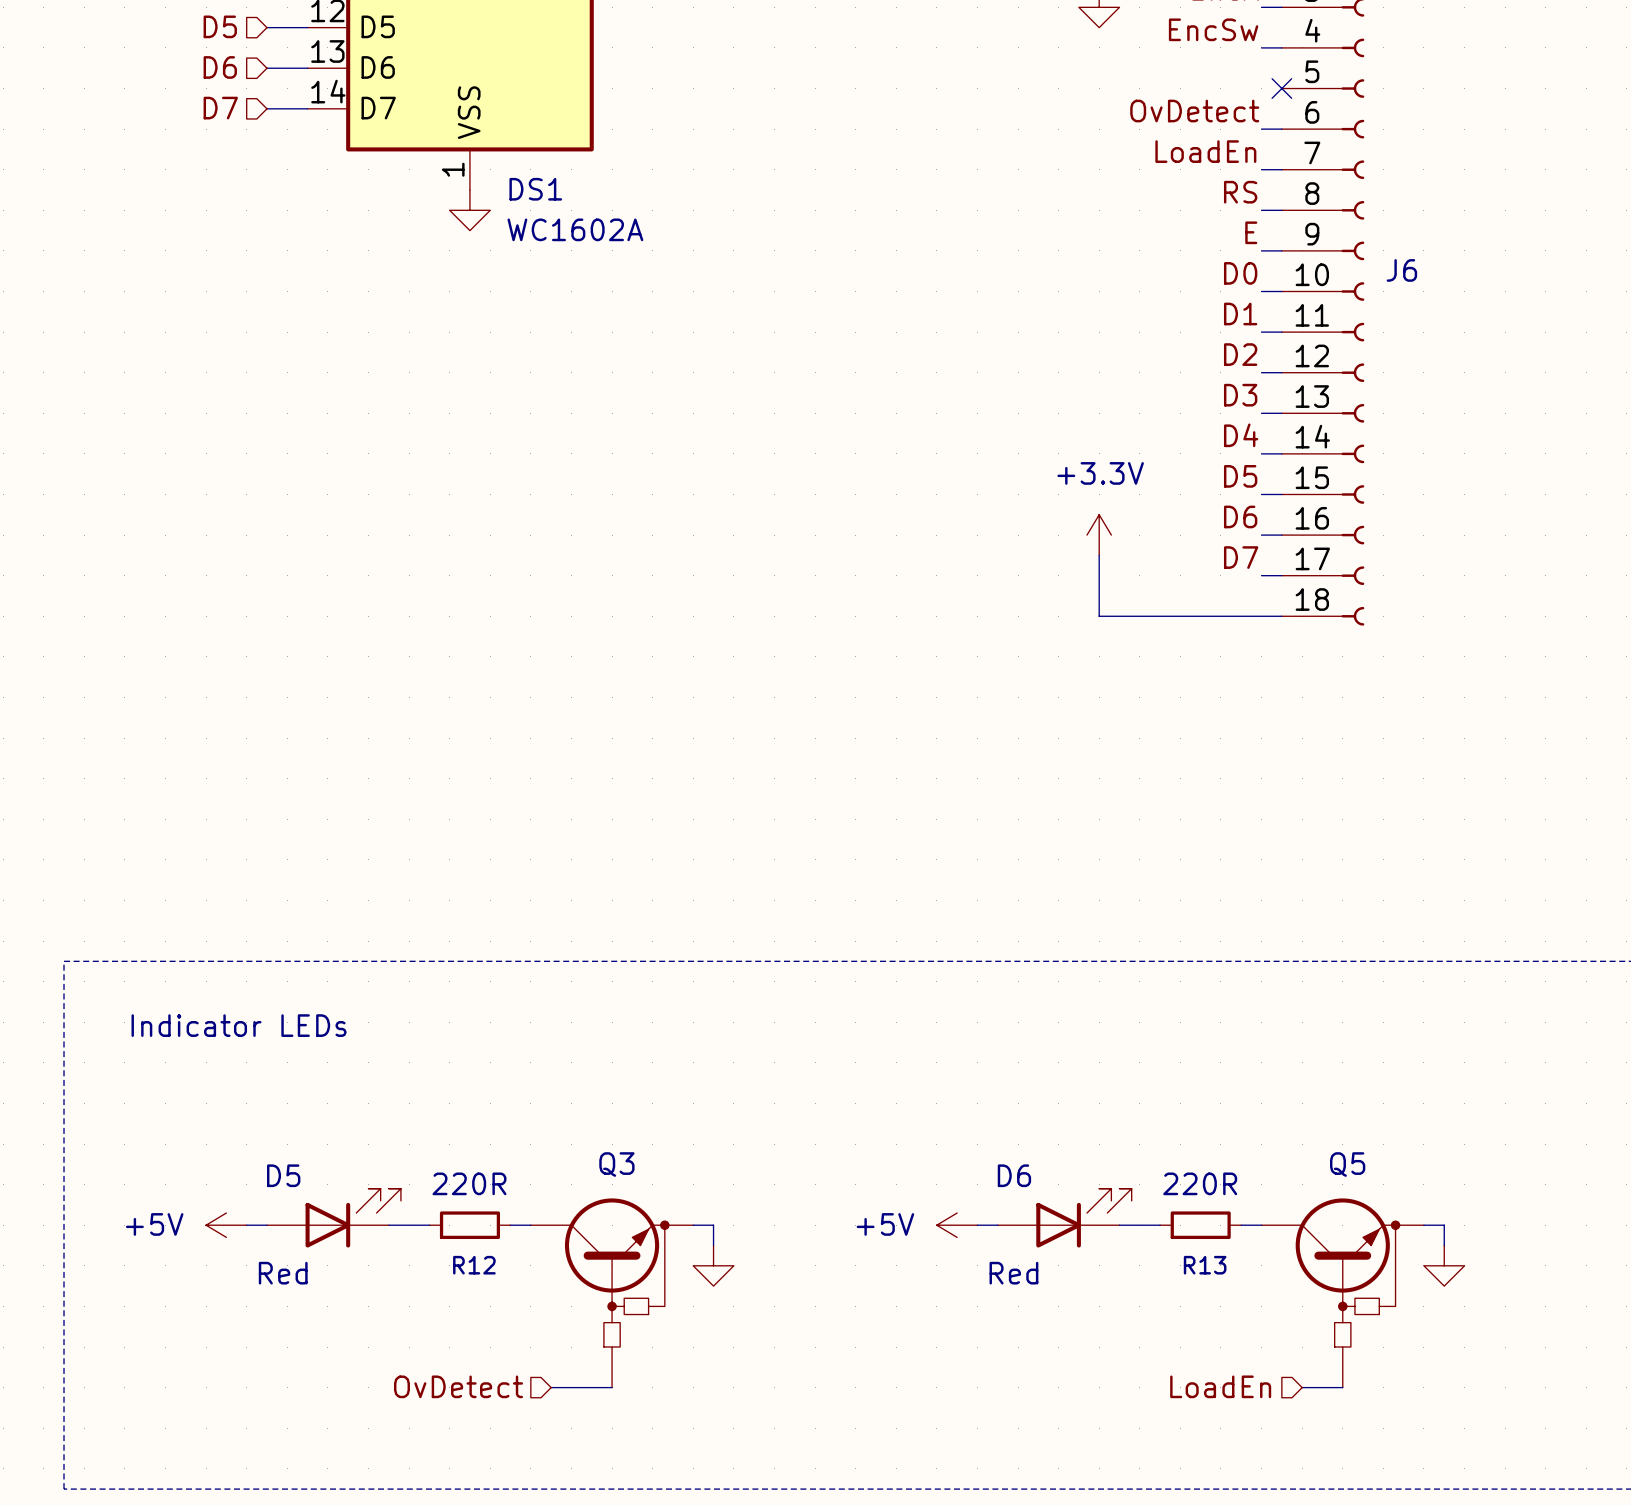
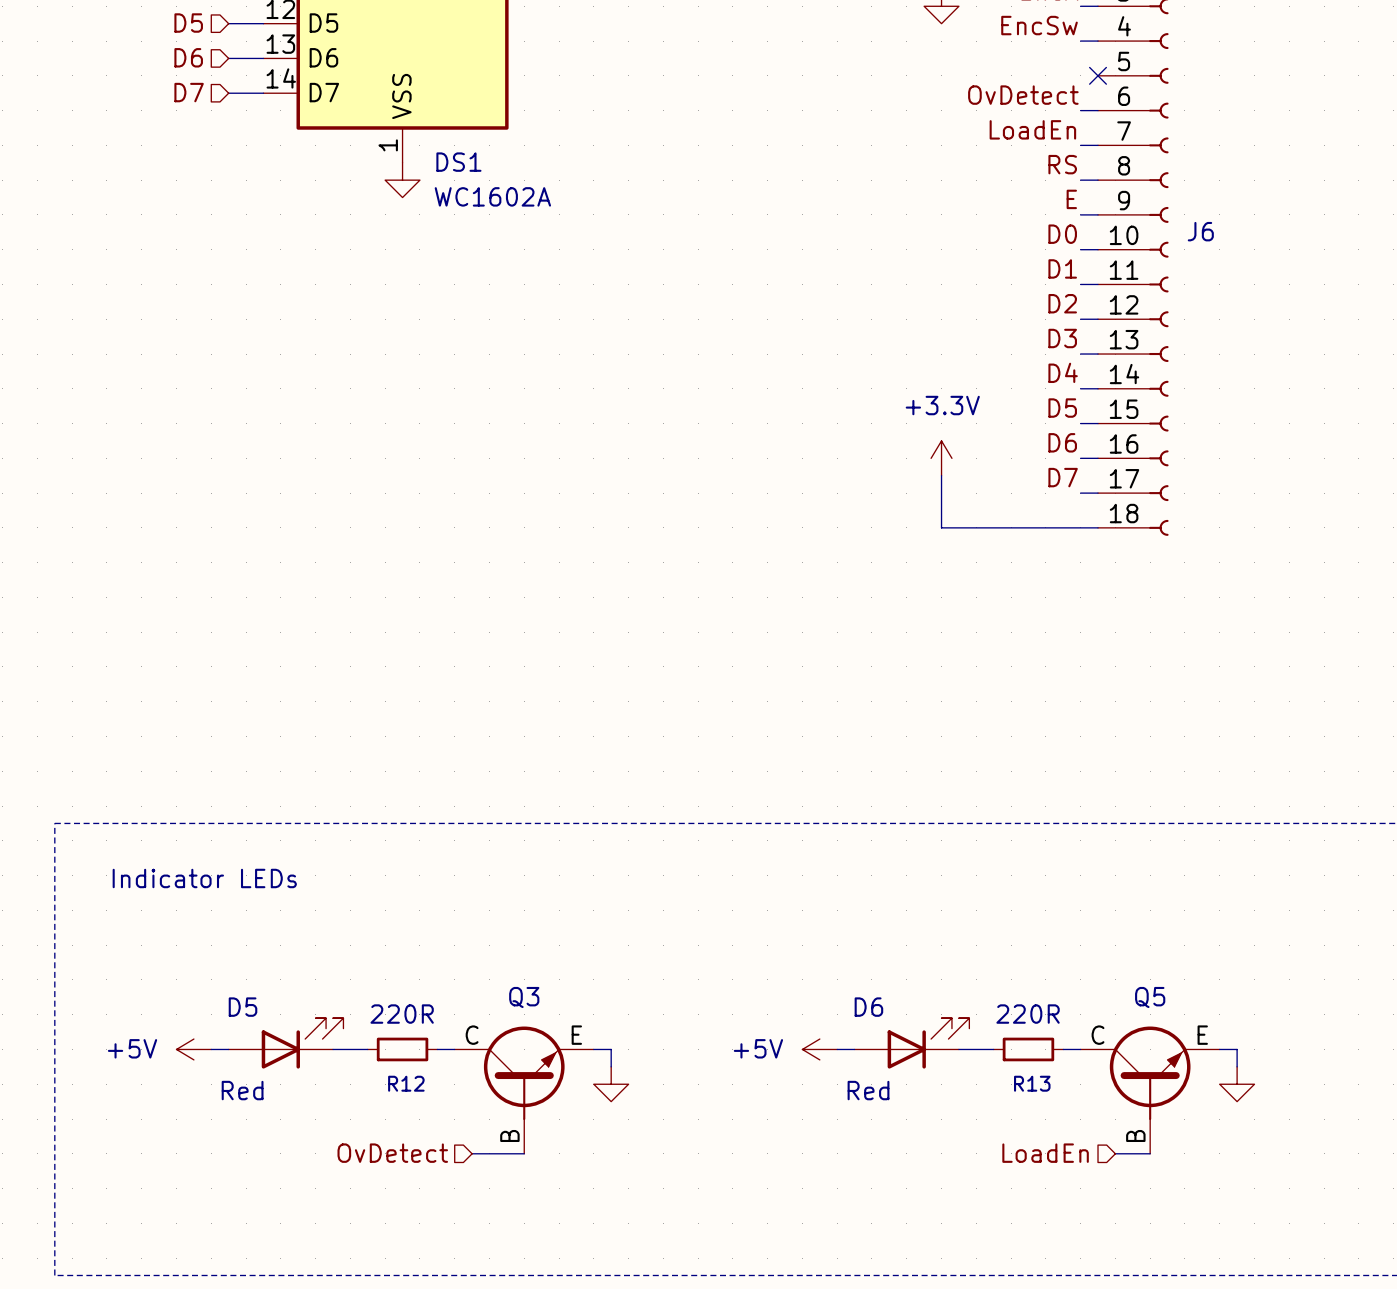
Q3 symbol: [530, 1198, 694, 1388] -> [454, 1026, 594, 1154]
Q5 symbol: [1261, 1198, 1424, 1388] -> [1080, 1026, 1220, 1154]
hierarchical label position: OvDetect (458, 1386) -> OvDetect (392, 1153)
hierarchical label position: LoadEn (1220, 1386) -> LoadEn (1045, 1153)
wire: (551, 1387) (612, 1387) -> (472, 1153) (524, 1153)
wire: (1302, 1387) (1342, 1387) -> (1115, 1153) (1150, 1153)

